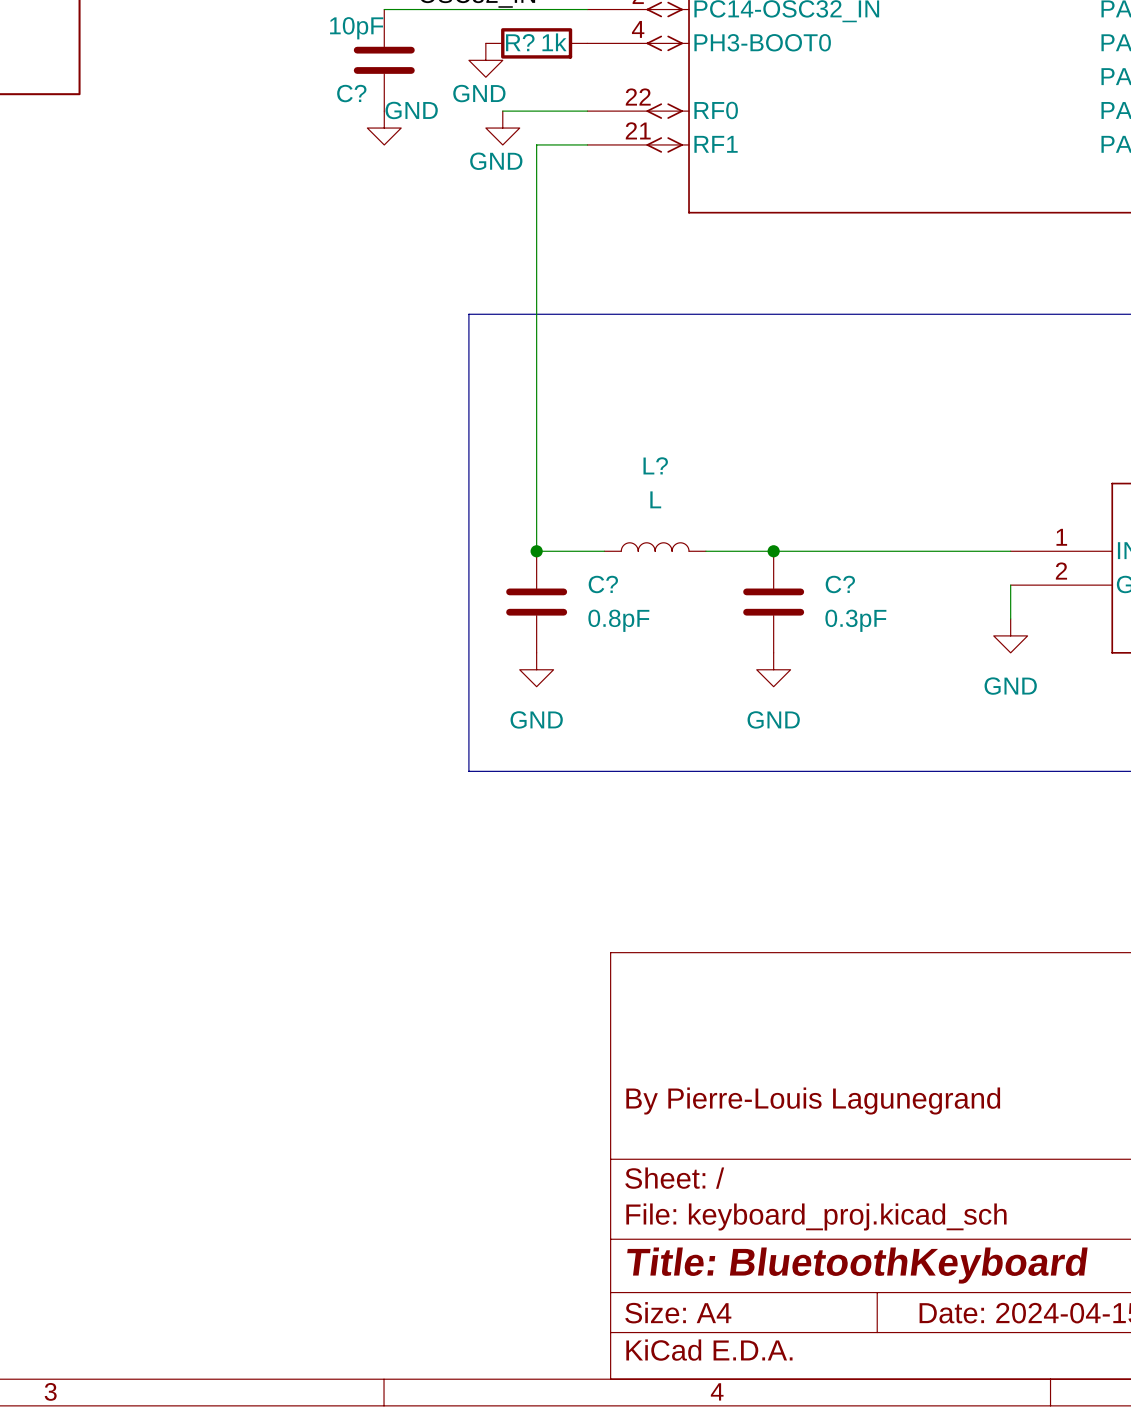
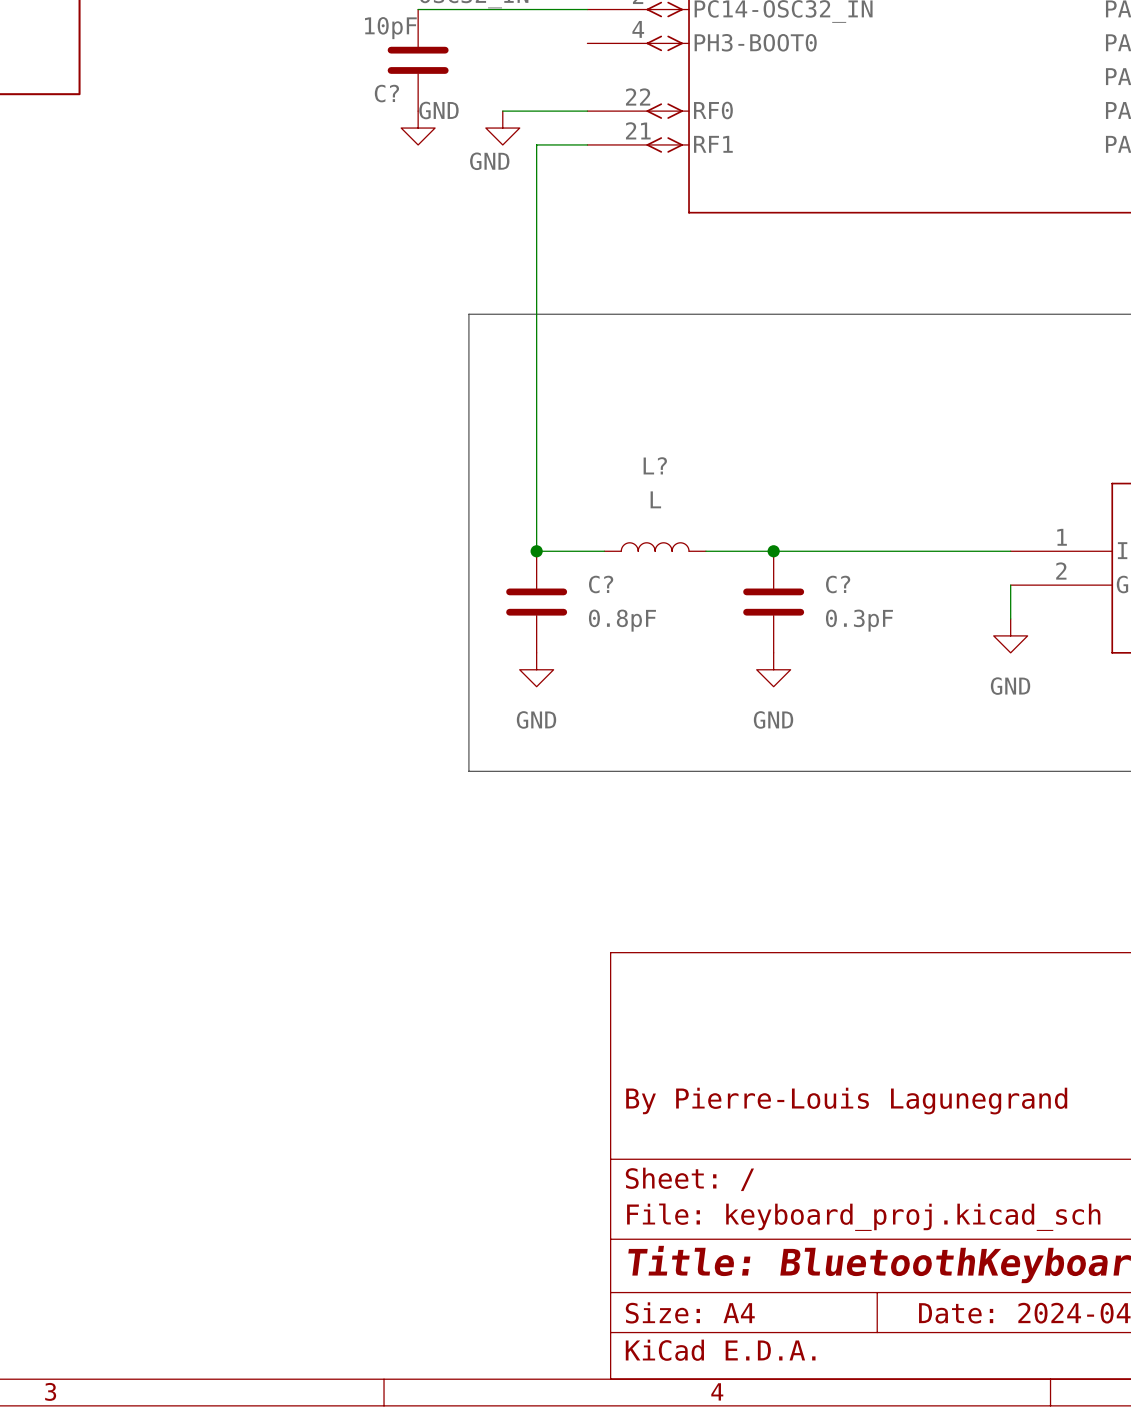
wire: (384, 9) (418, 9) -> none
R?: 1k (536, 43) -> none
C? position: (384, 60) -> (418, 60)
power symbol: GND (485, 60) -> none
power symbol position: GND (384, 128) -> GND (418, 128)

